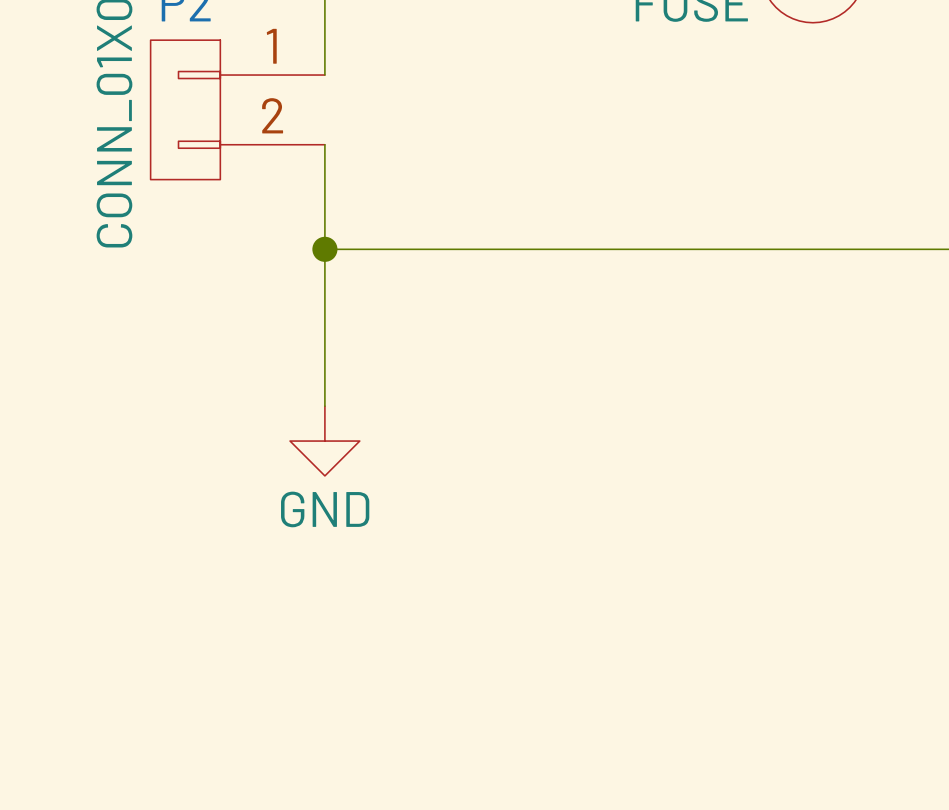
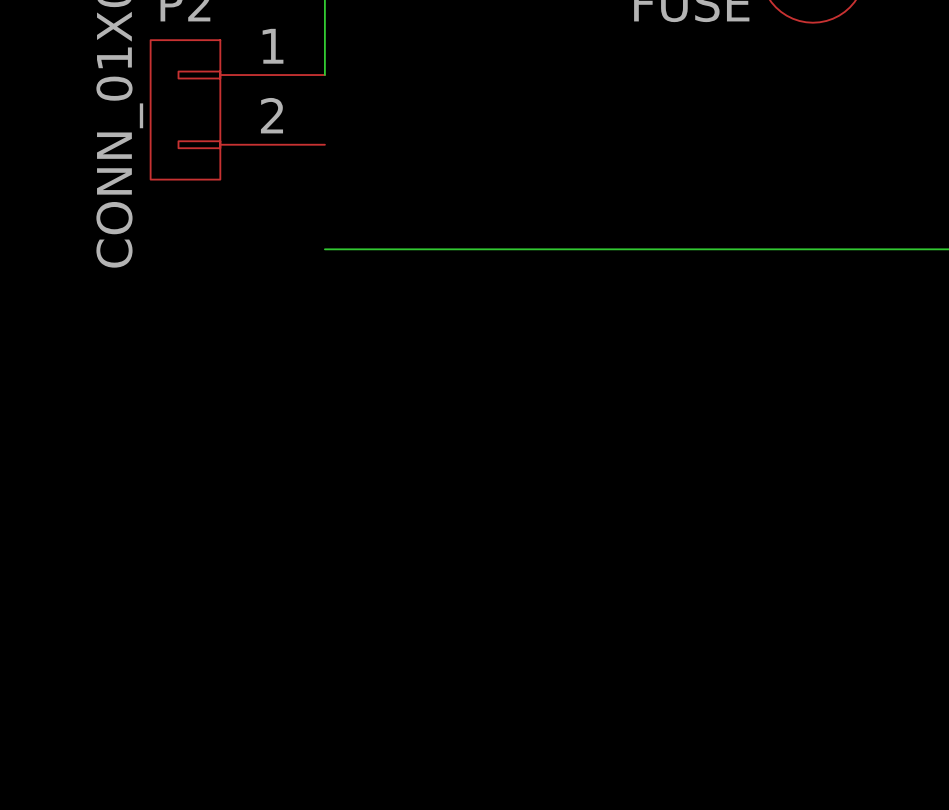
wire: (324, 144) (324, 406) -> none
junction: (324, 249) -> none
power symbol: GND (324, 441) -> none

